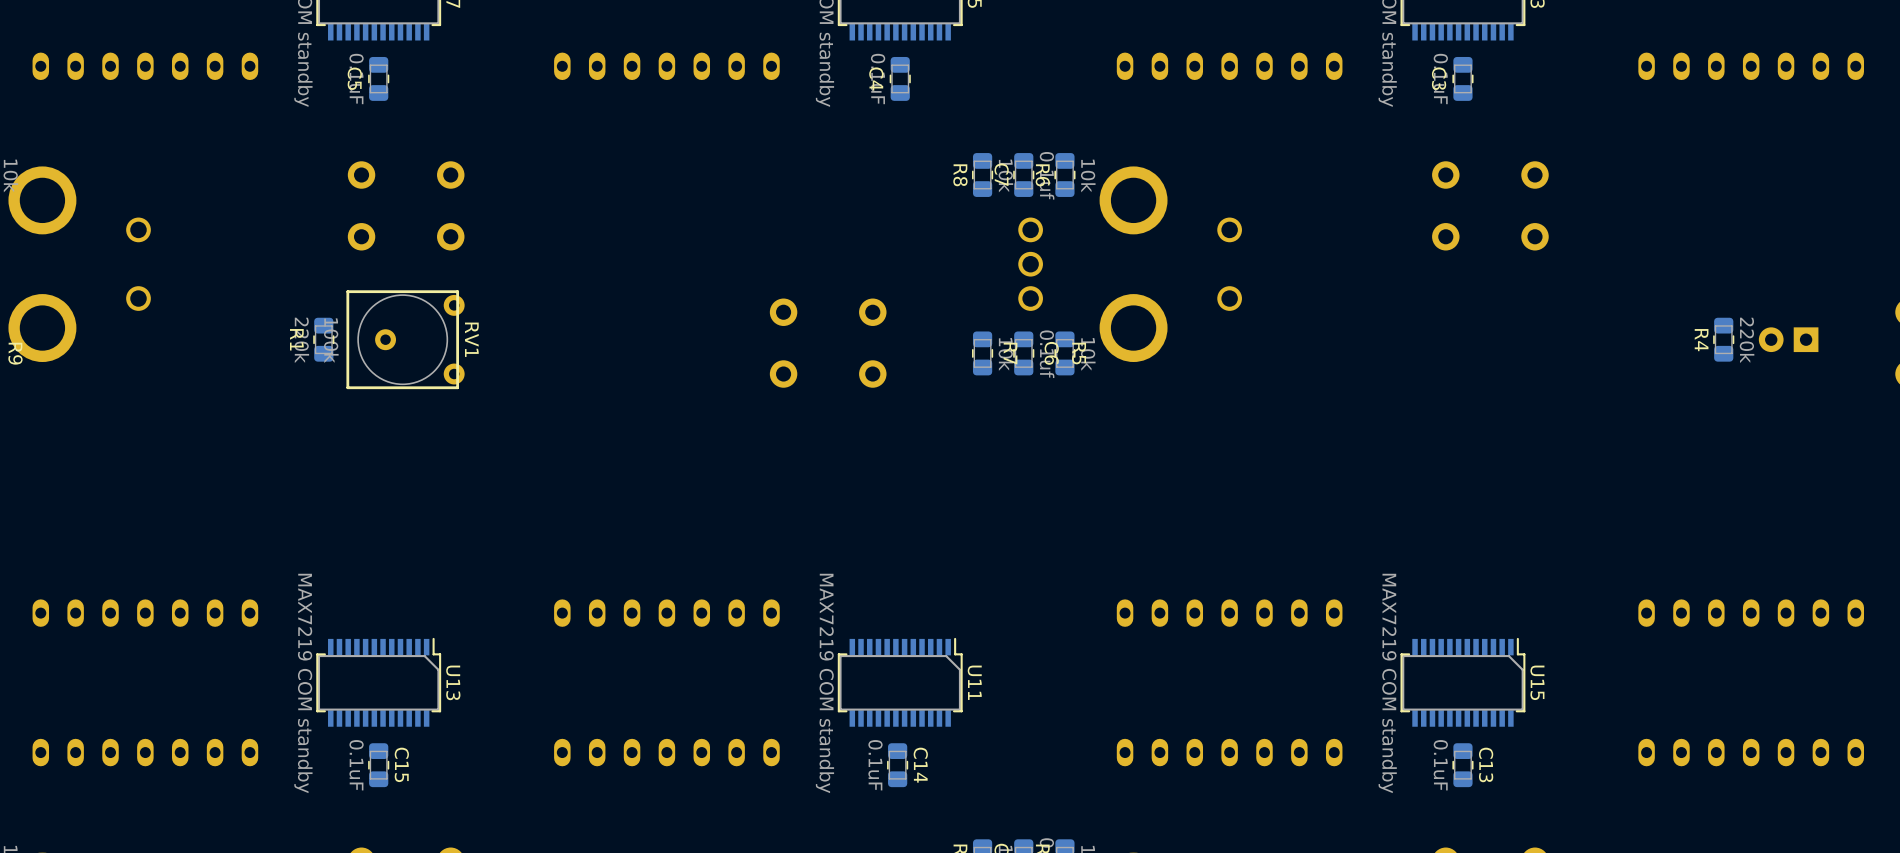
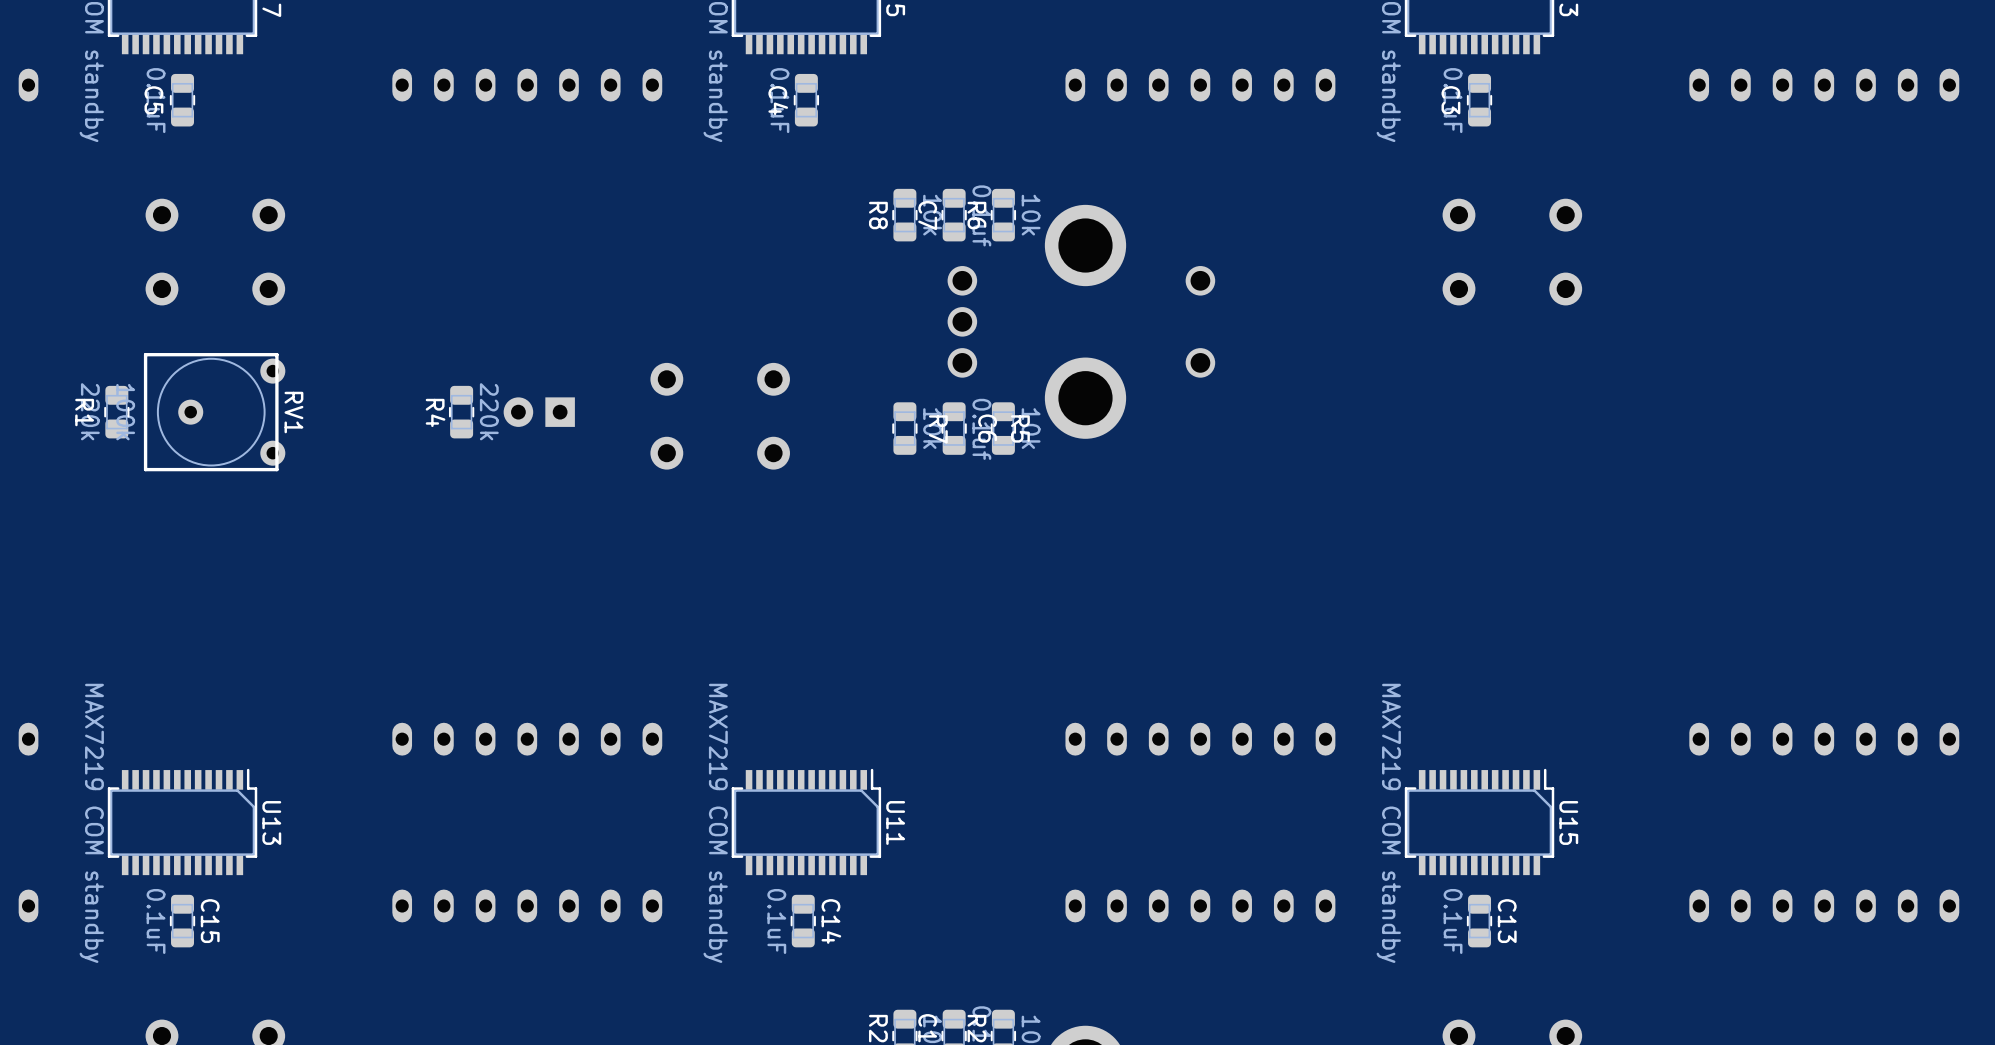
part: none -> (539, 412)
R4 position: (1723, 339) -> (461, 412)
part: (1788, 339) -> none

